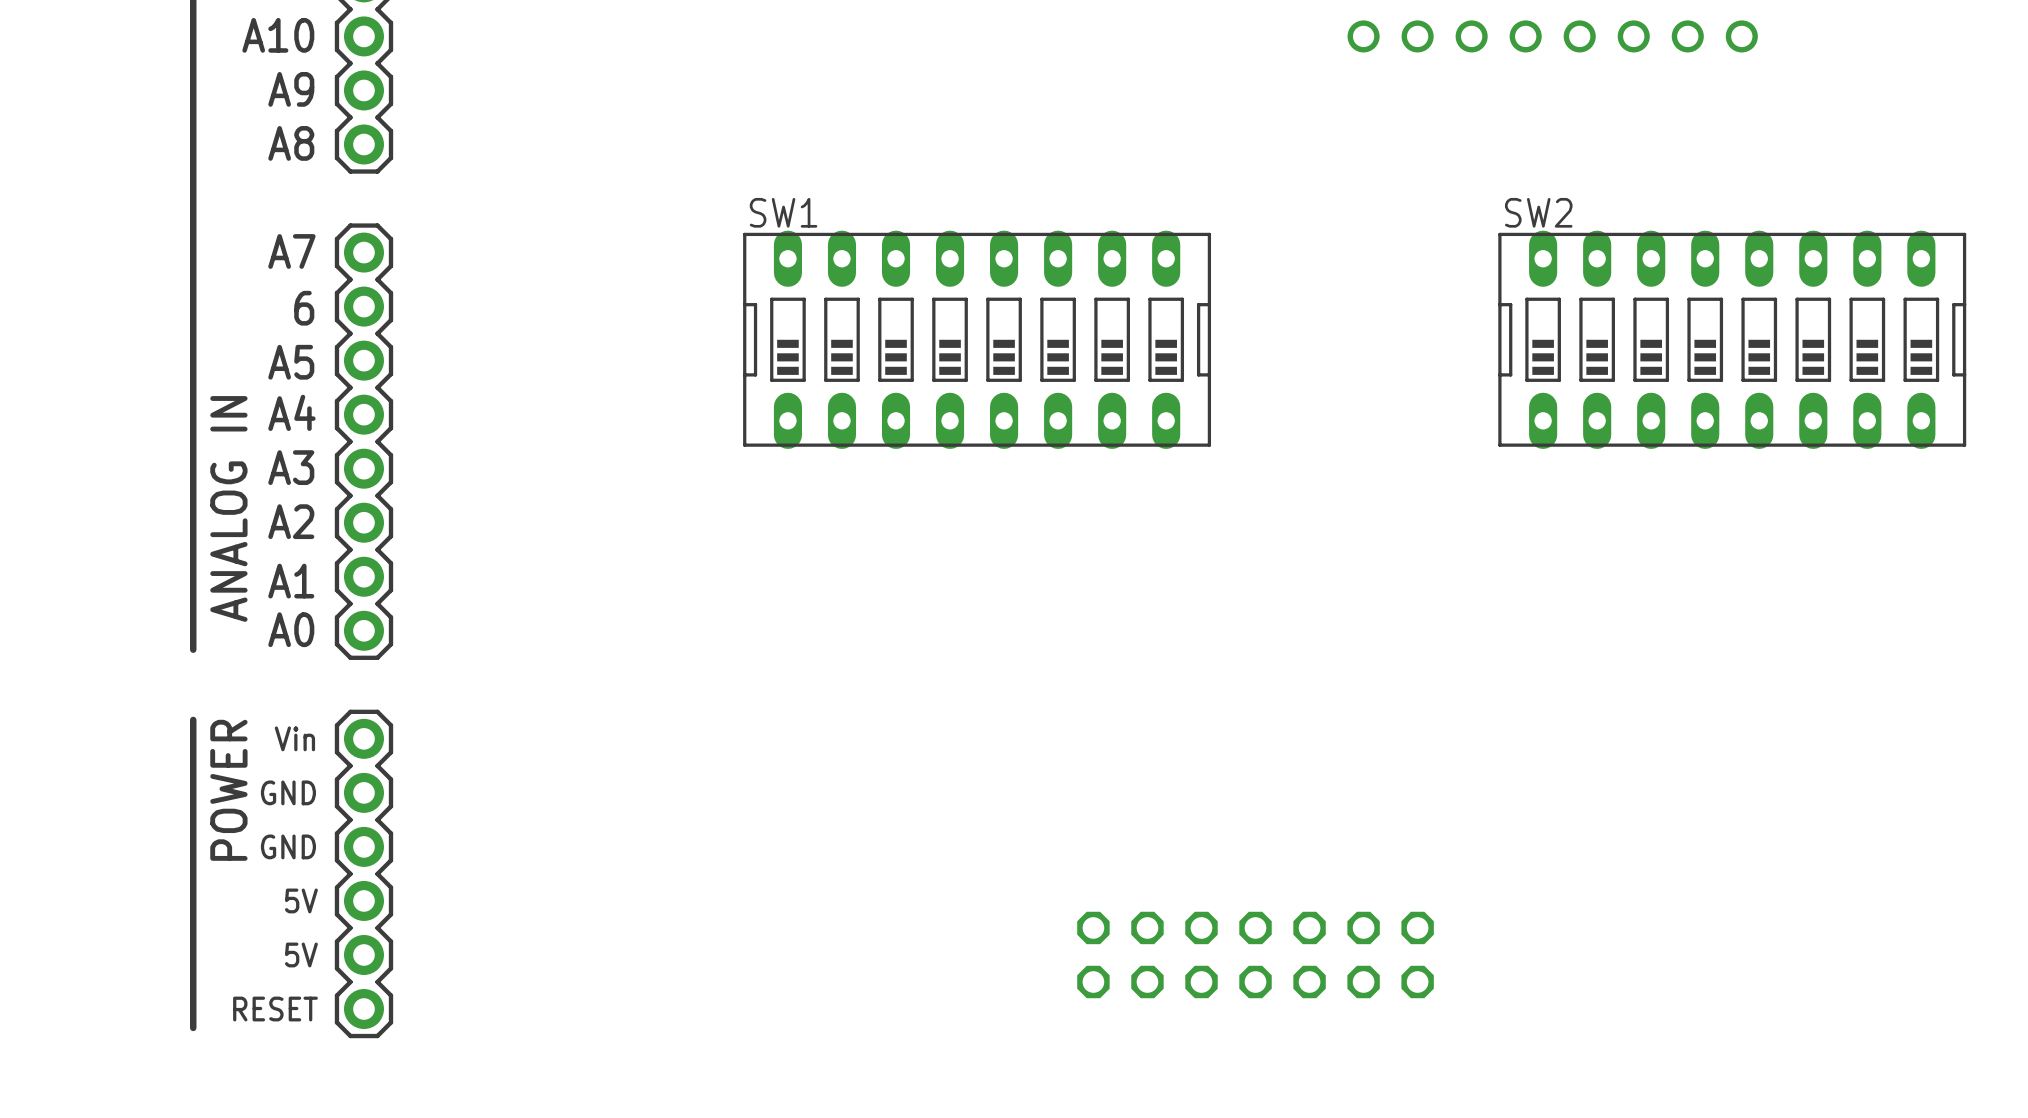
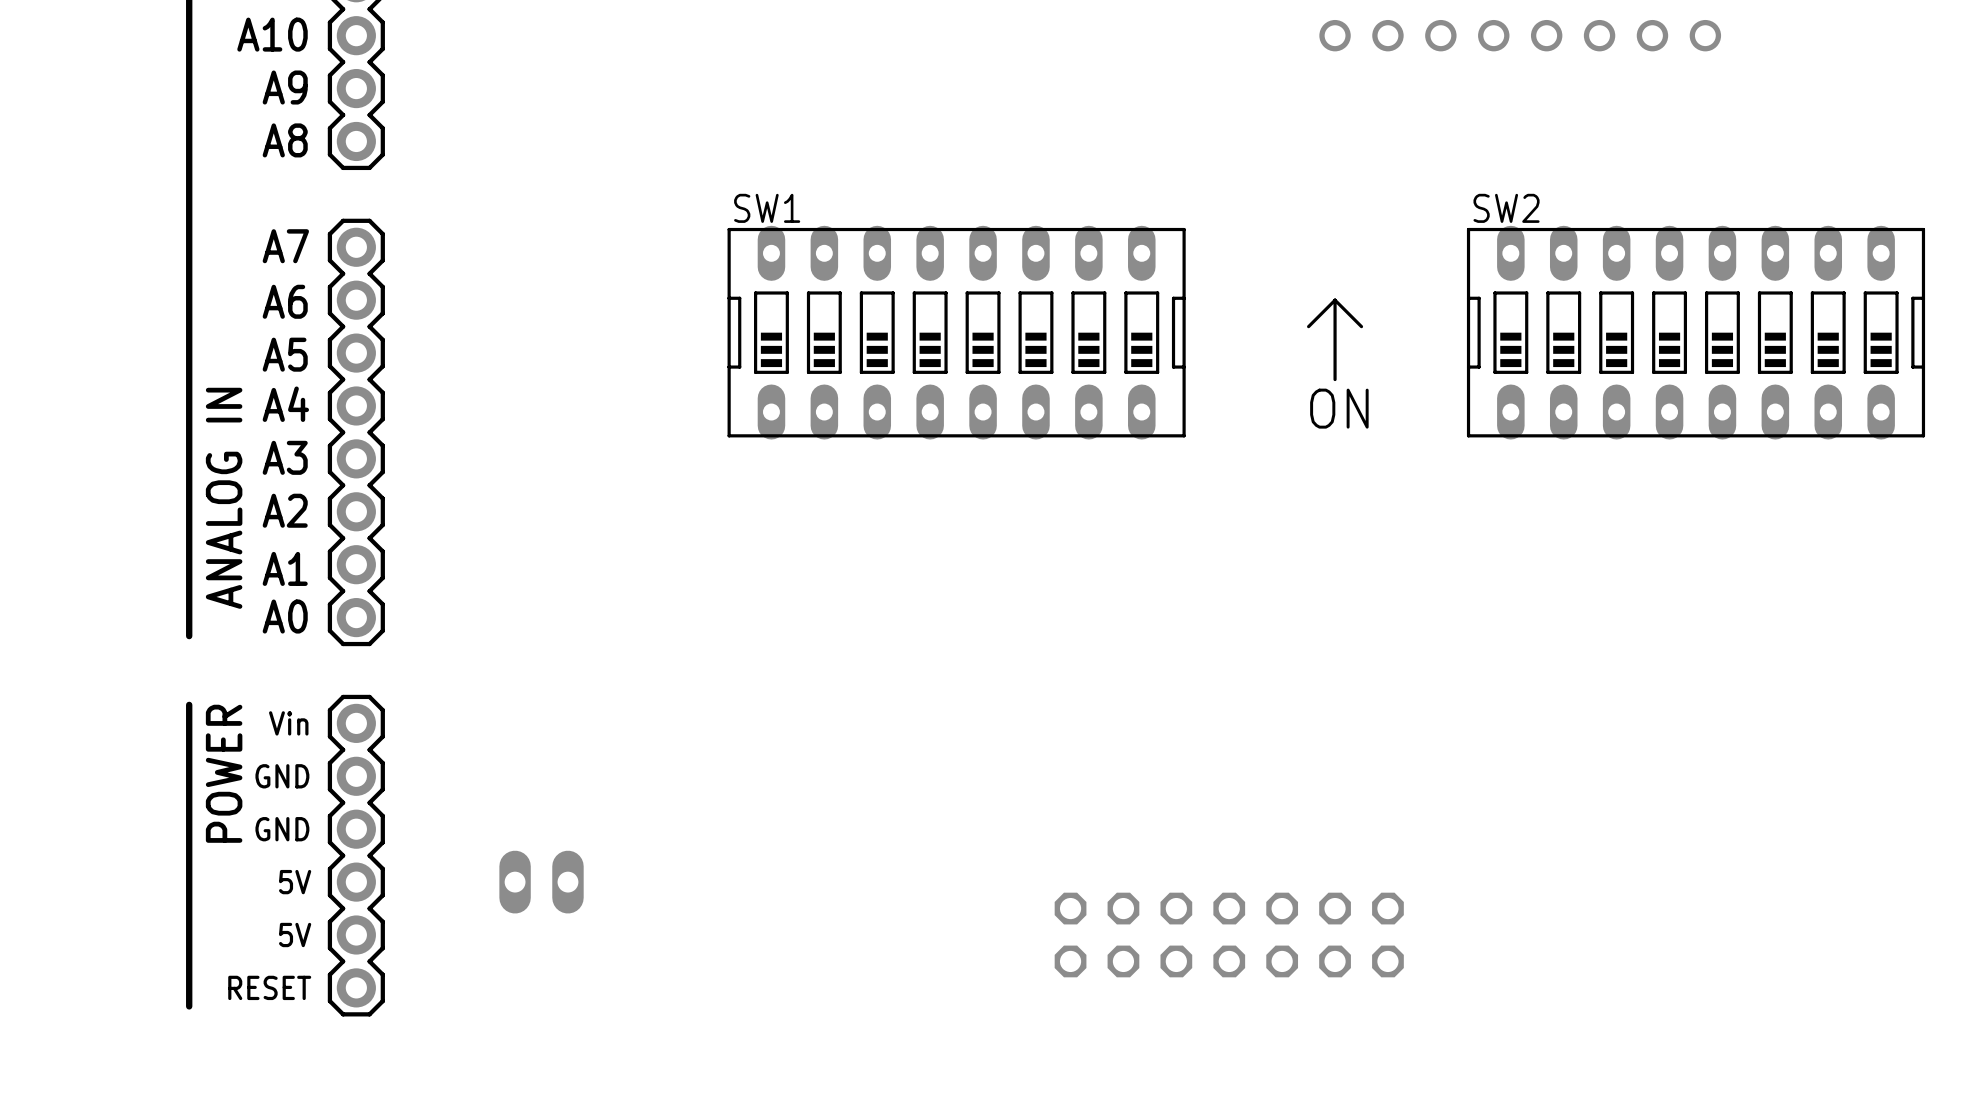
line: none -> (1335, 300) (1335, 379)
line: none -> (1335, 300) (1308, 326)
line: none -> (1335, 300) (1361, 326)
part text: 6 (304, 308) -> A6 (285, 301)
text: none -> ON (1339, 408)
part: none -> (541, 882)

